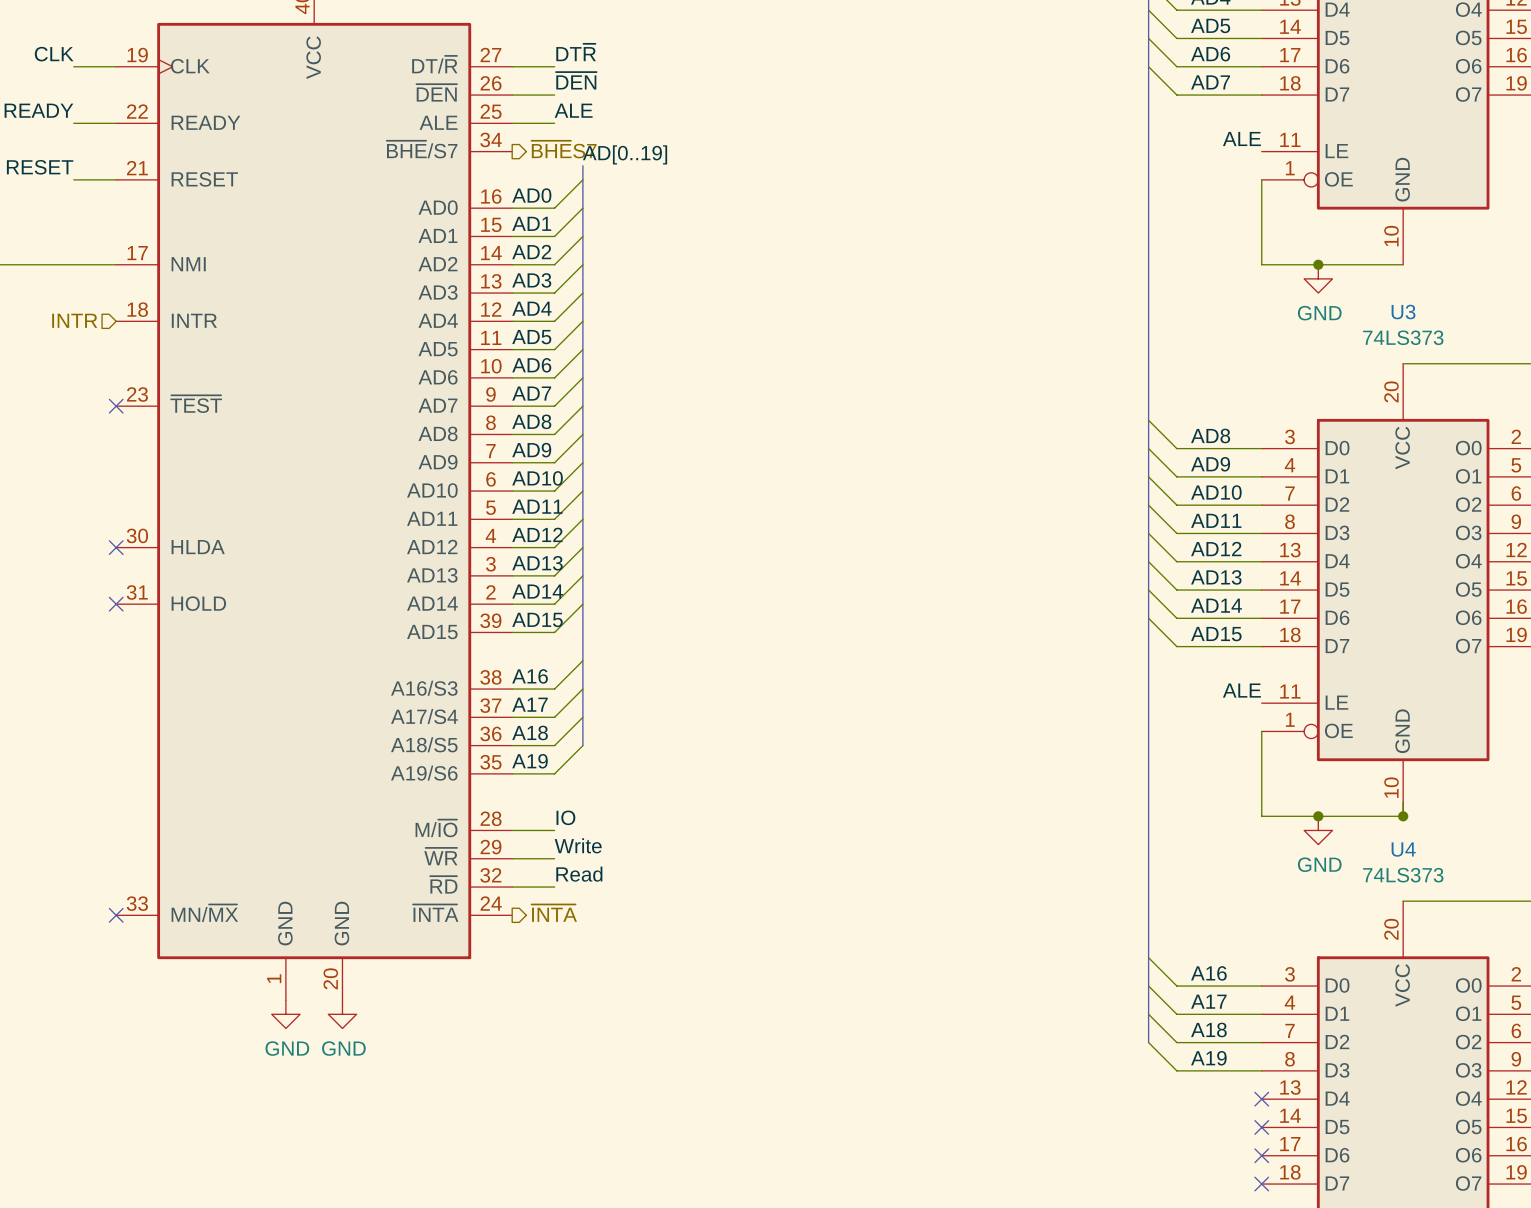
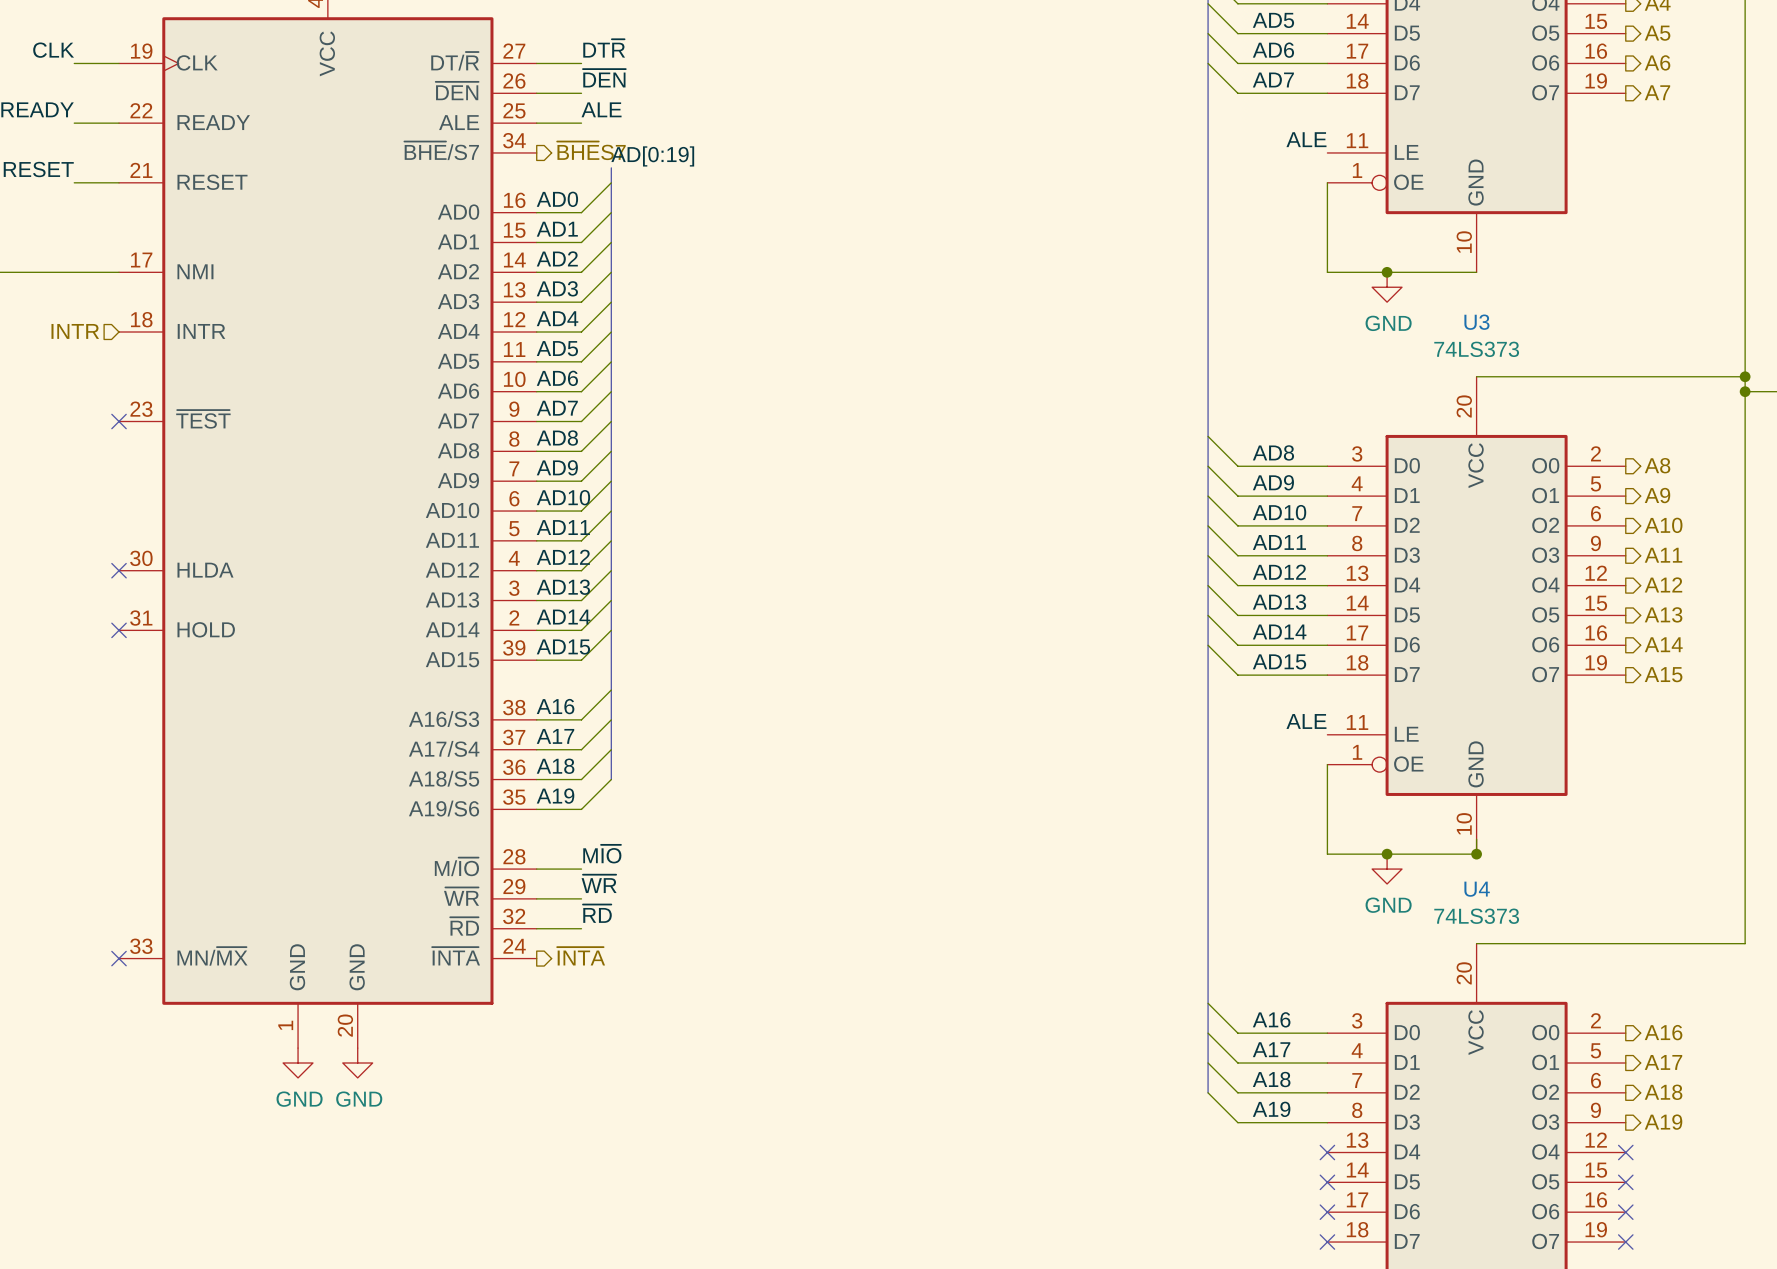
label: AD[0..19] (625, 154) -> AD[0:19] (652, 156)
label: IO (565, 817) -> M~{IO} (602, 854)
label: Write (578, 845) -> ~{WR} (599, 883)
label: Read (579, 874) -> ~{RD} (597, 913)

